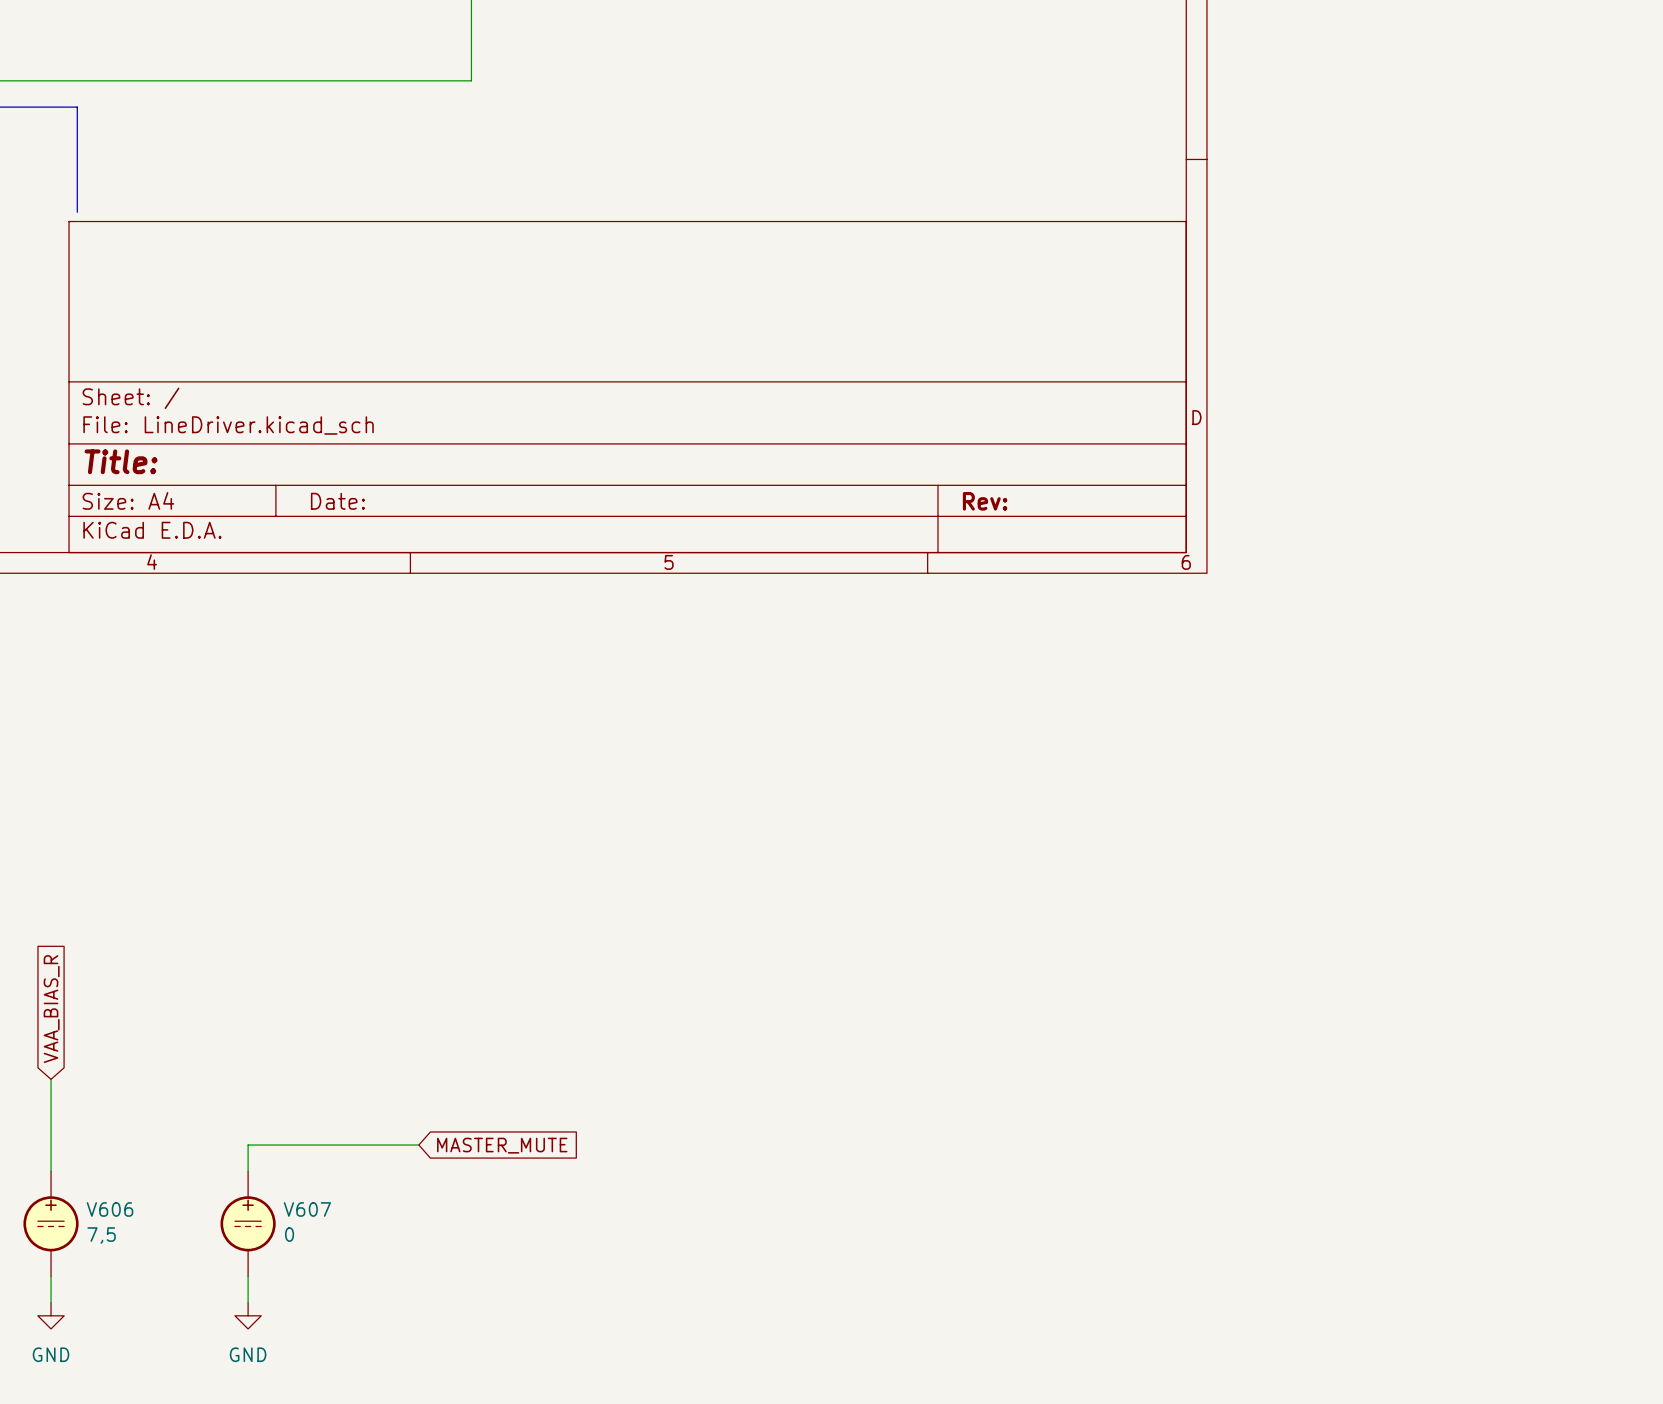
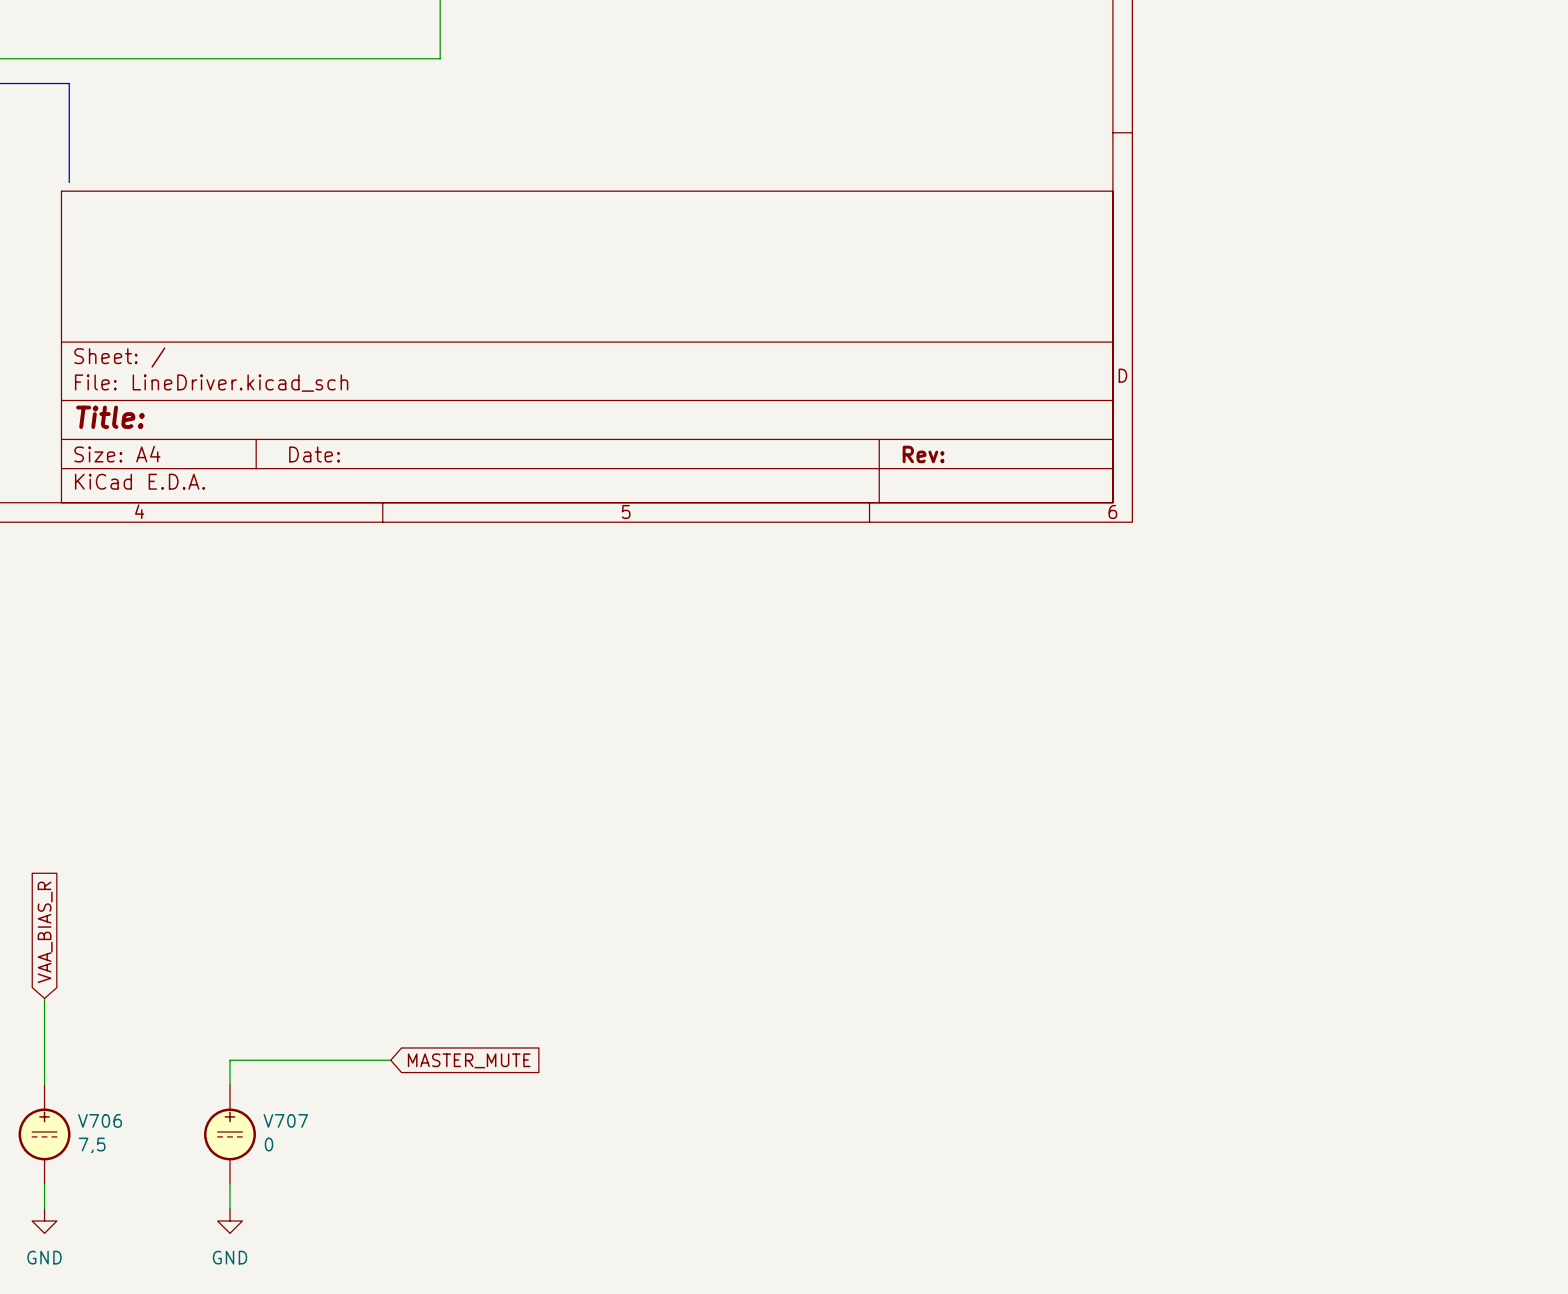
V606 name: V606 (109, 1209) -> V706 (100, 1120)
V607 name: V607 (307, 1209) -> V707 (285, 1120)

